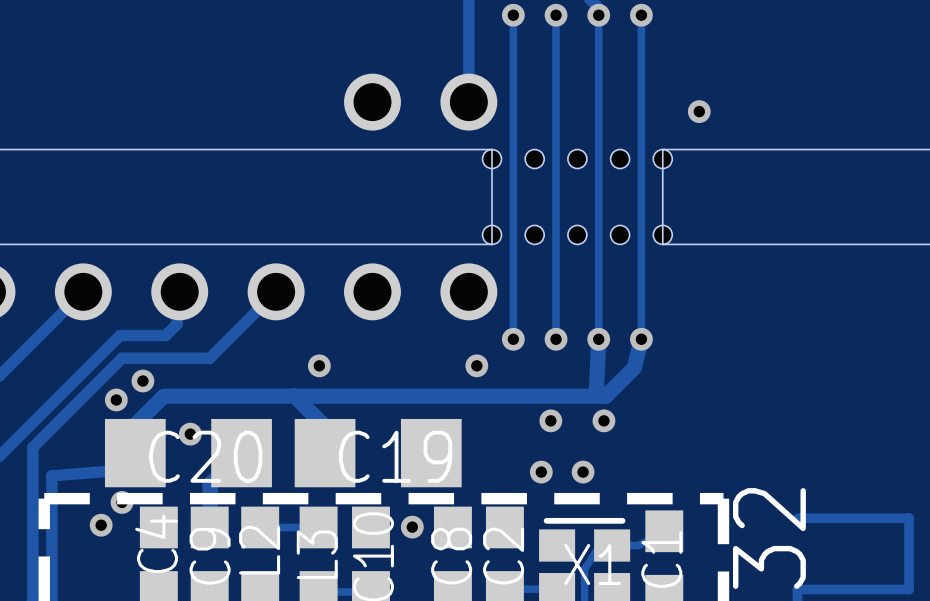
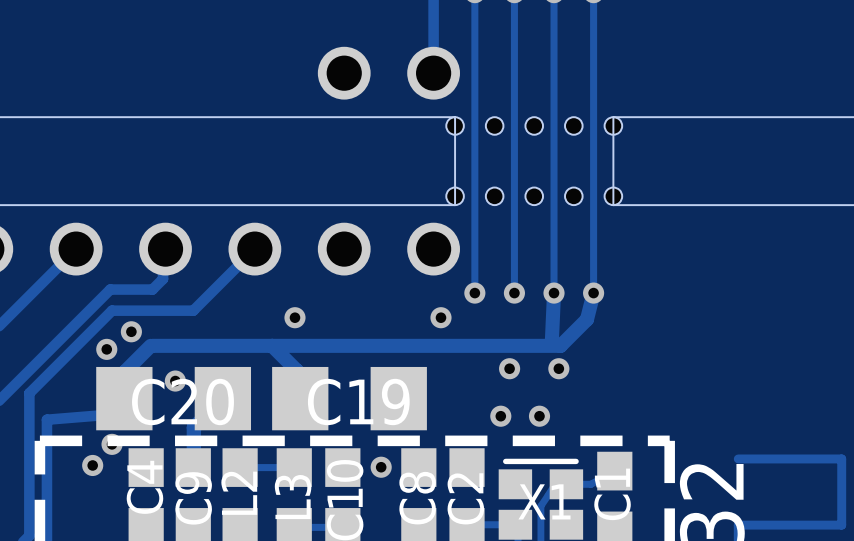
via: (699, 111) -> none

